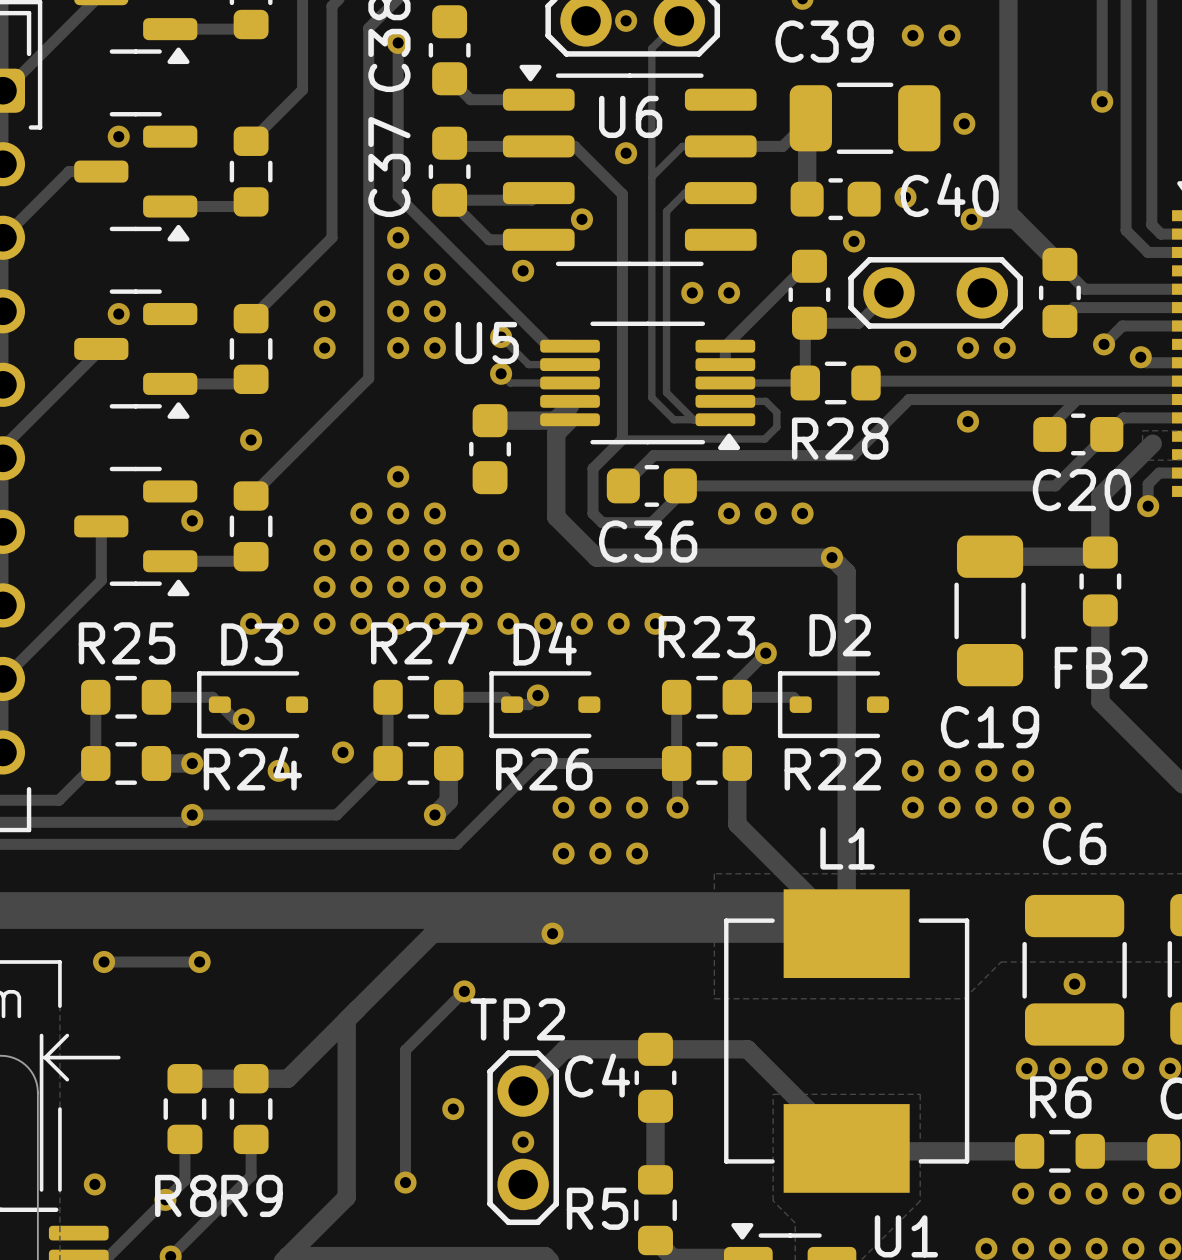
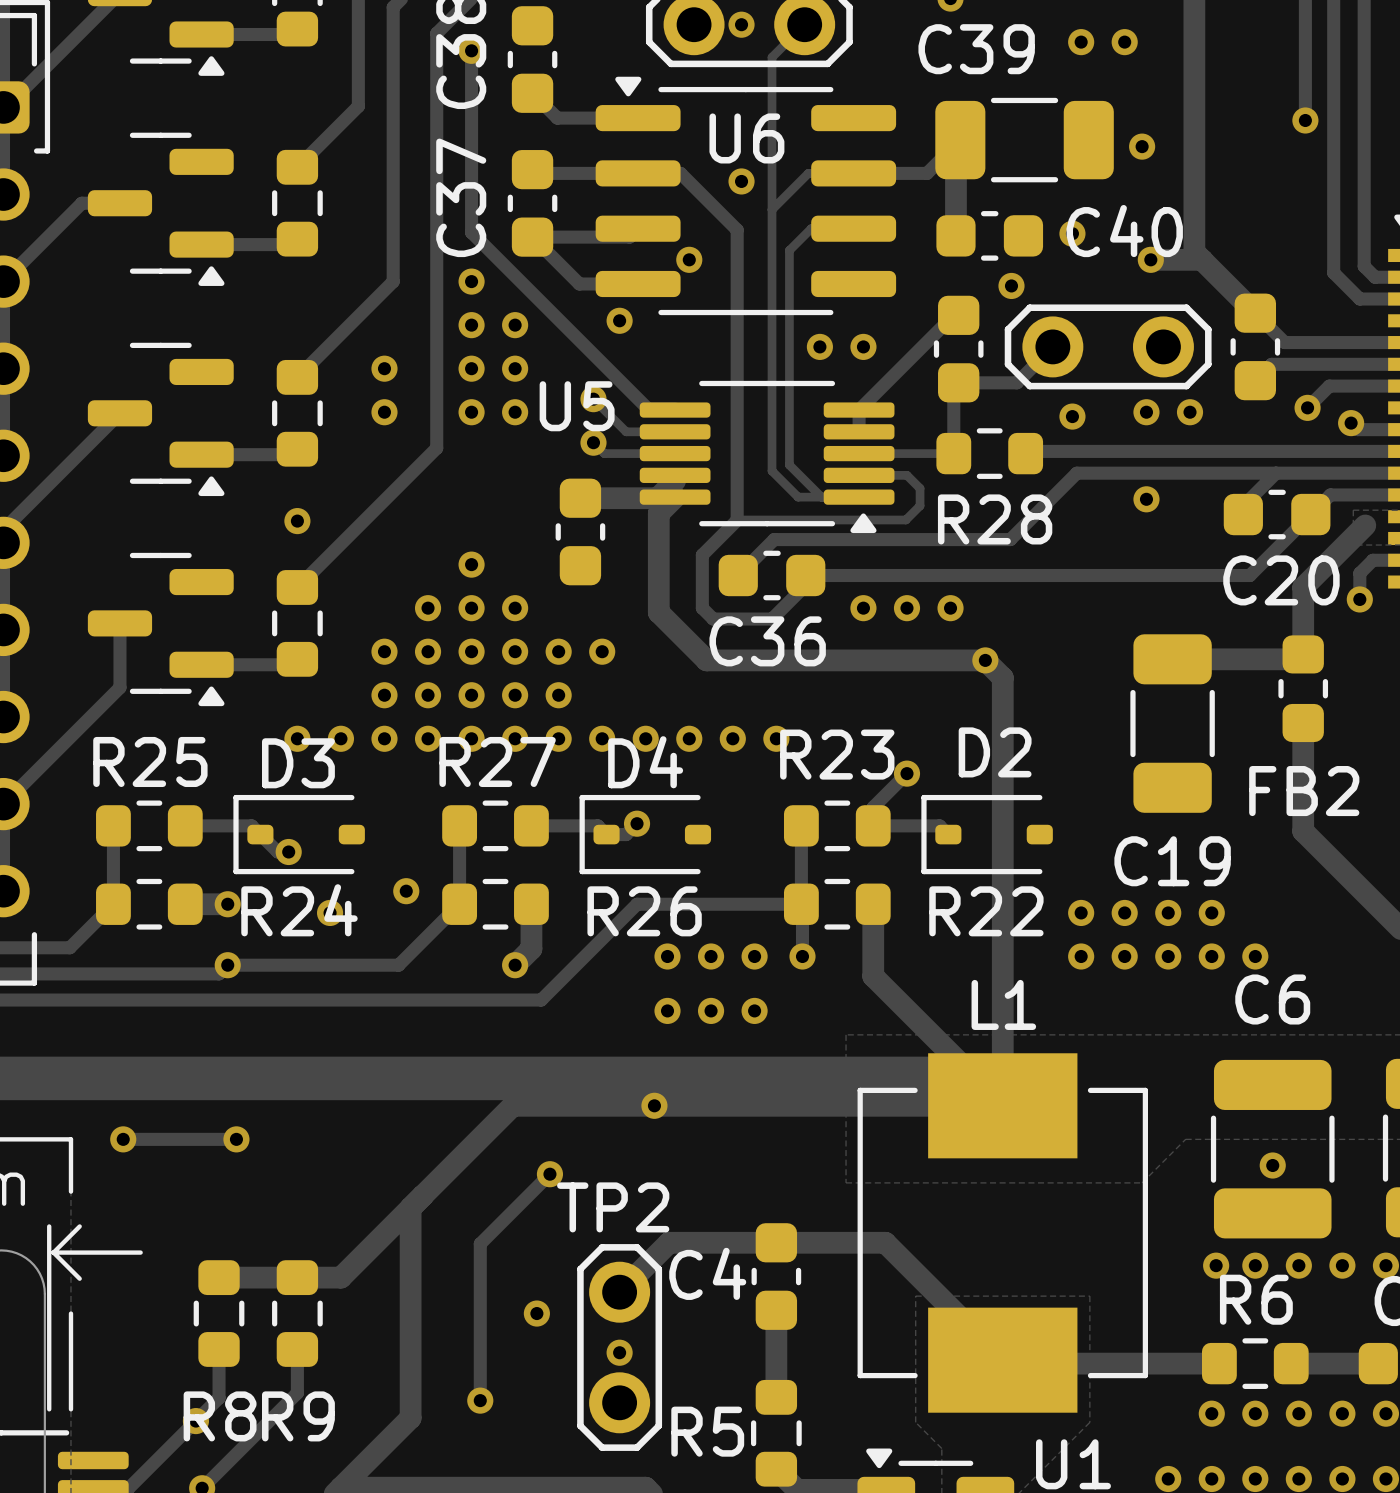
via: (118, 136) -> none
via: (118, 314) -> none
via: (192, 520) -> none
via: (94, 1184) -> none

